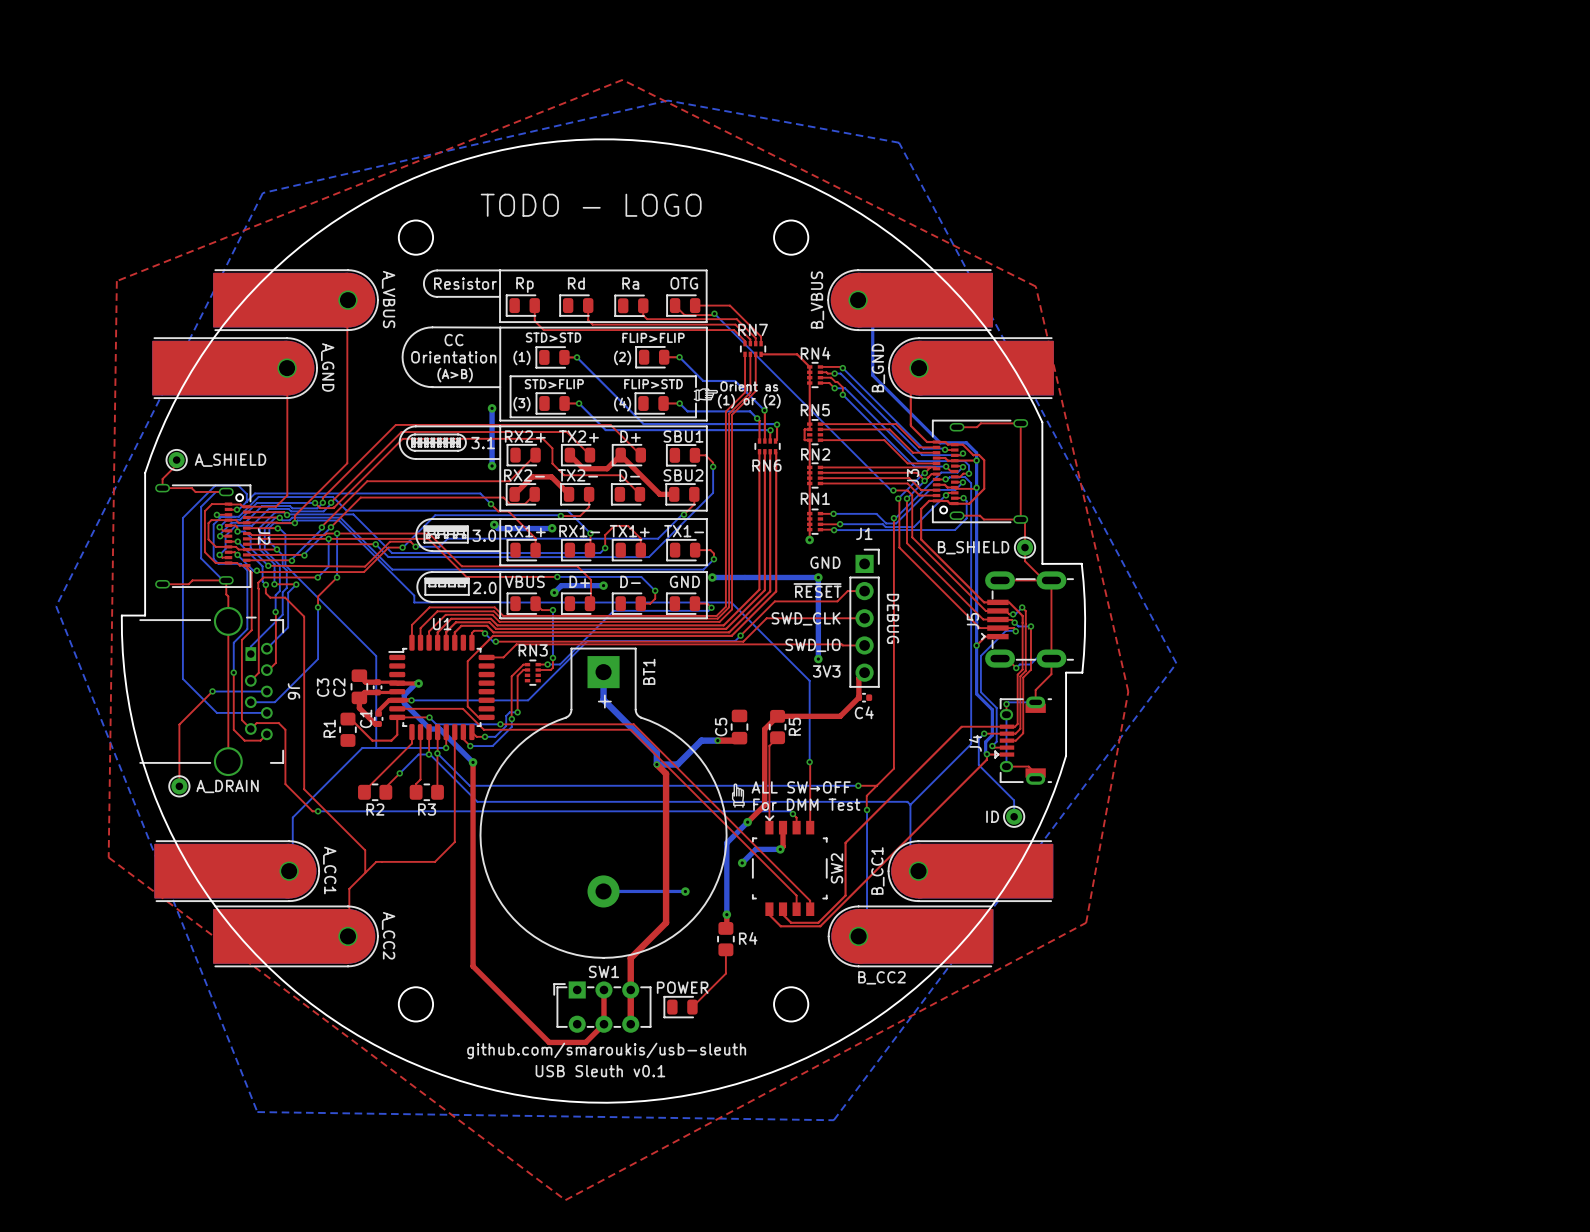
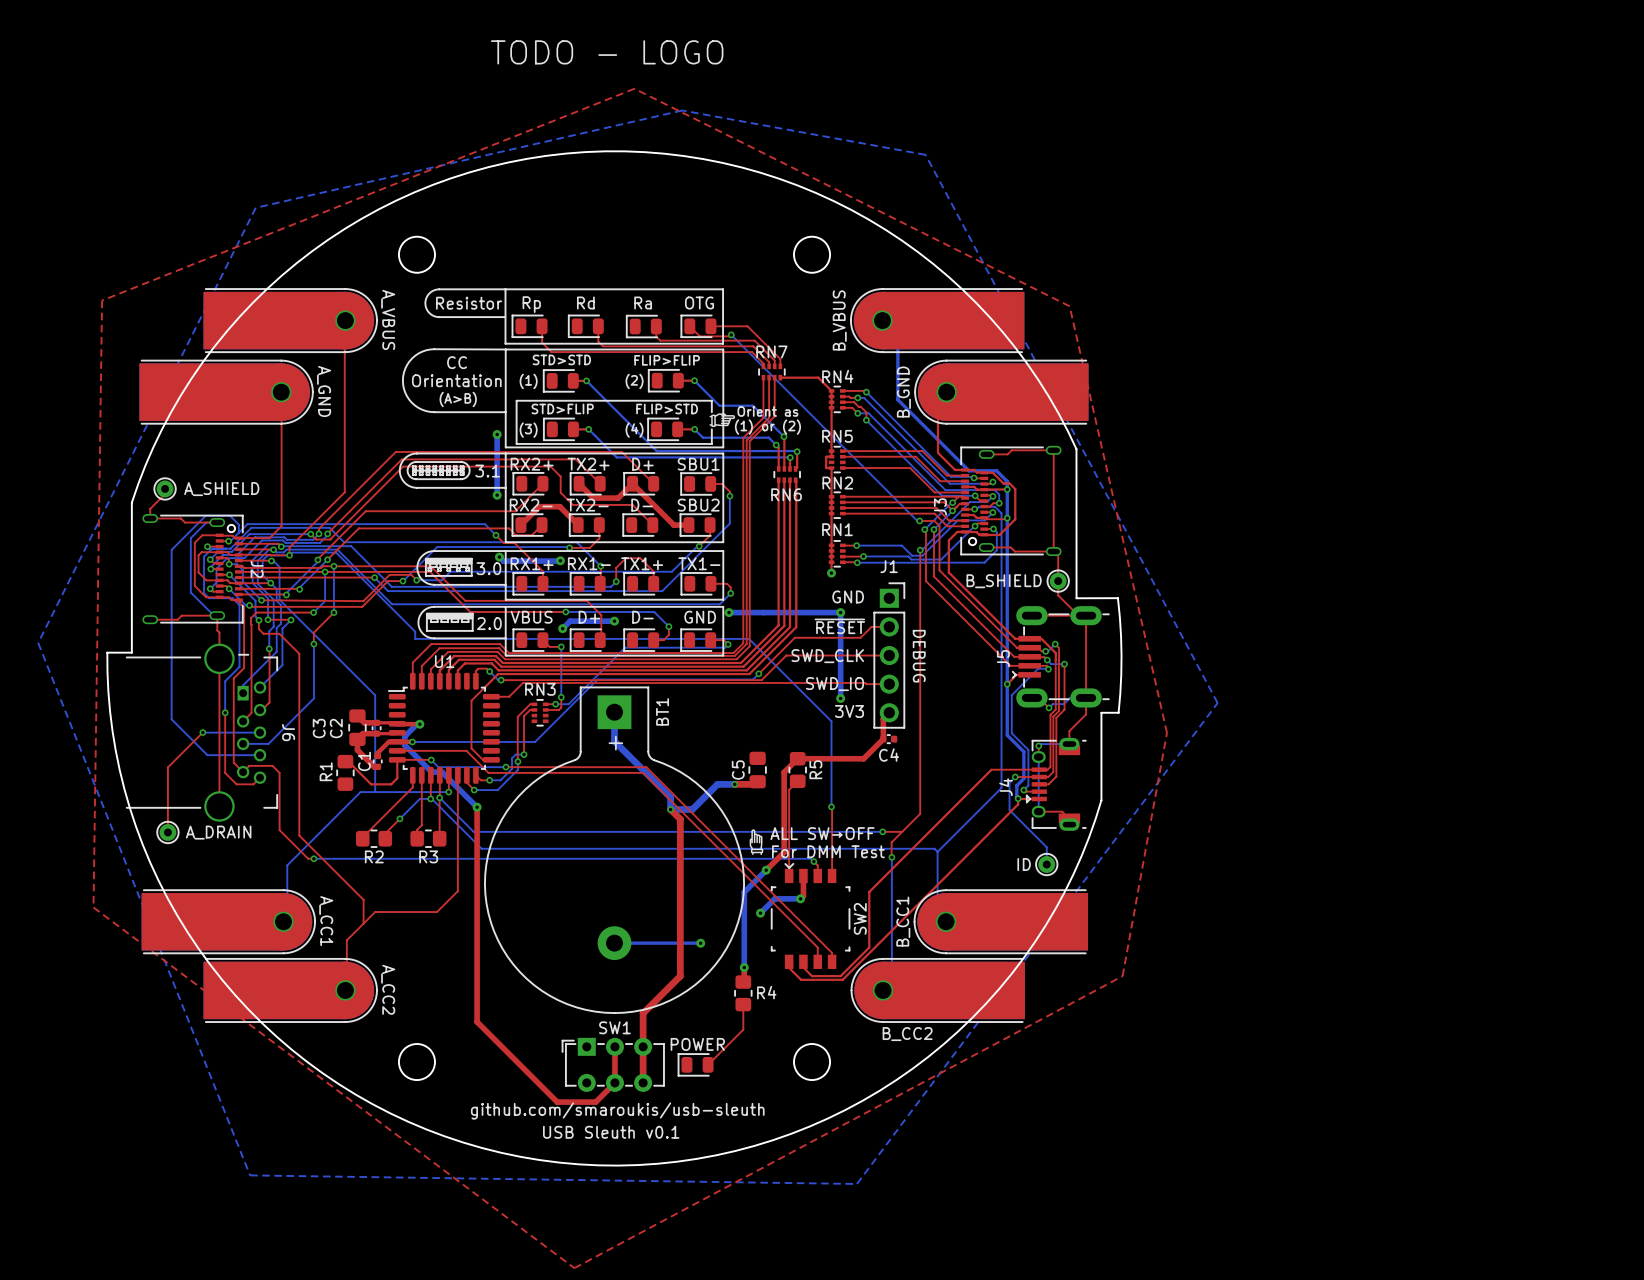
text position: TODO - LOGO (591, 205) -> TODO - LOGO (607, 52)

